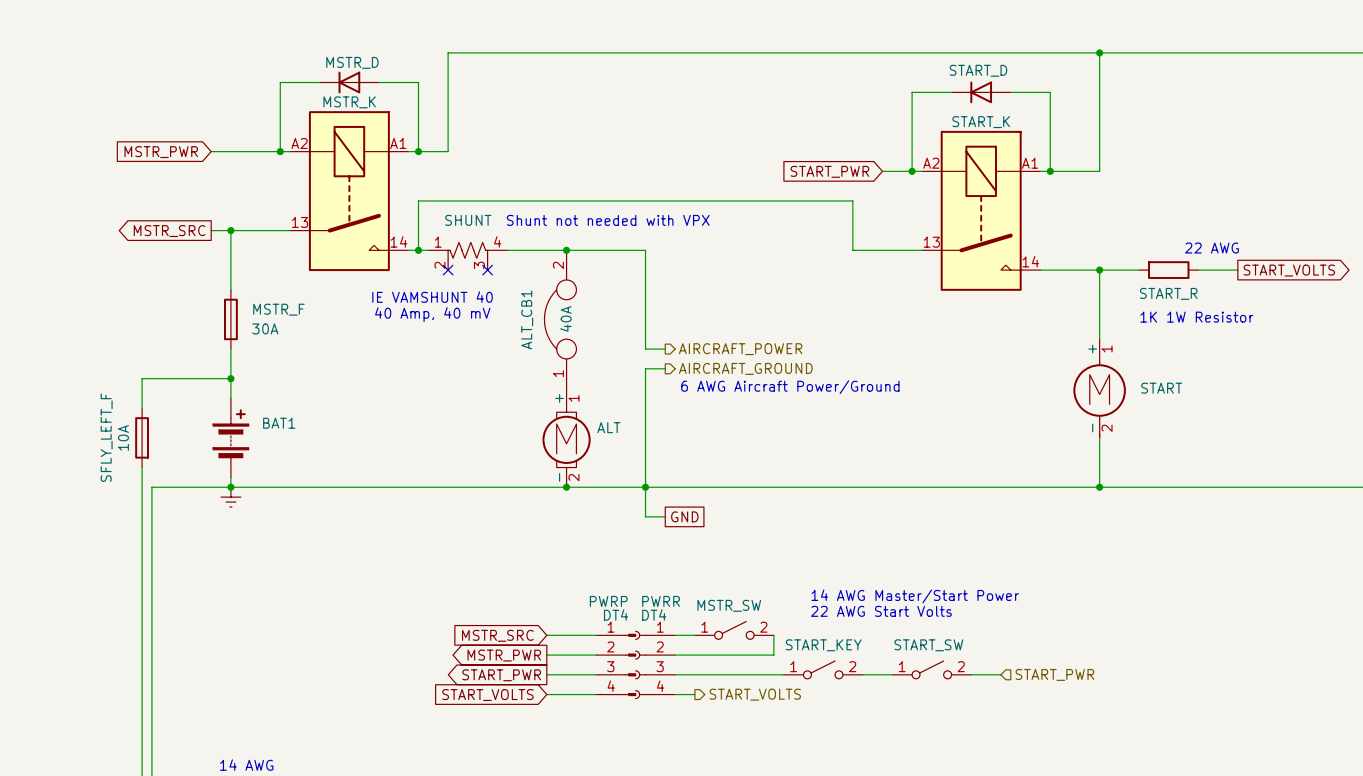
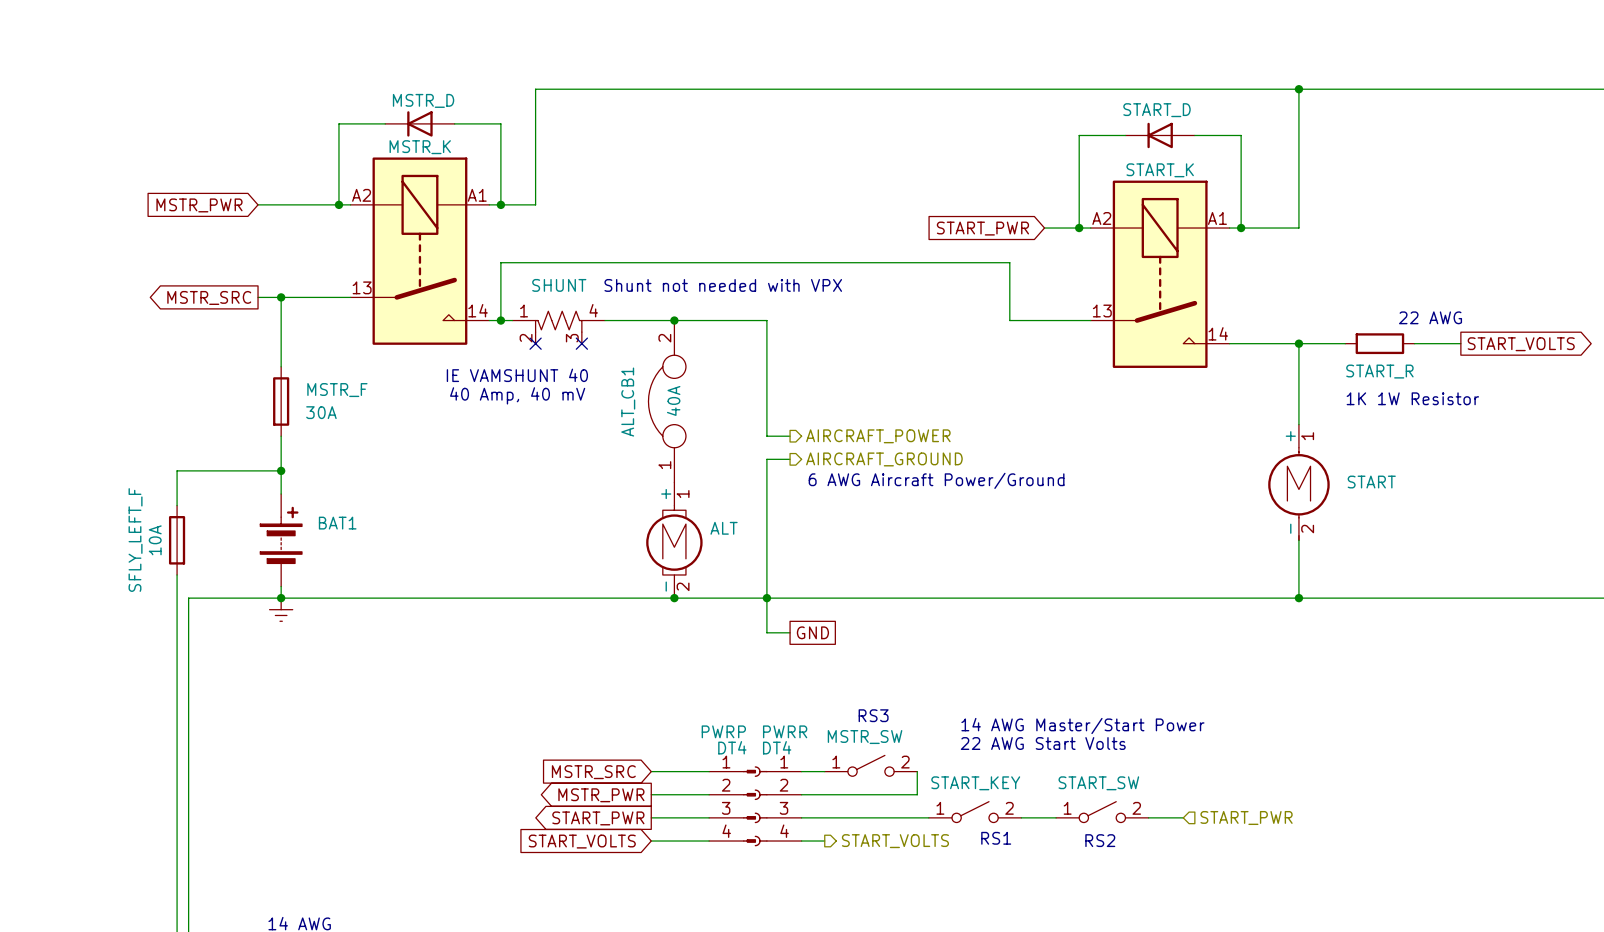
text: none -> RS3 (873, 715)
text: none -> RS1 (996, 838)
text: none -> RS2 (1100, 840)

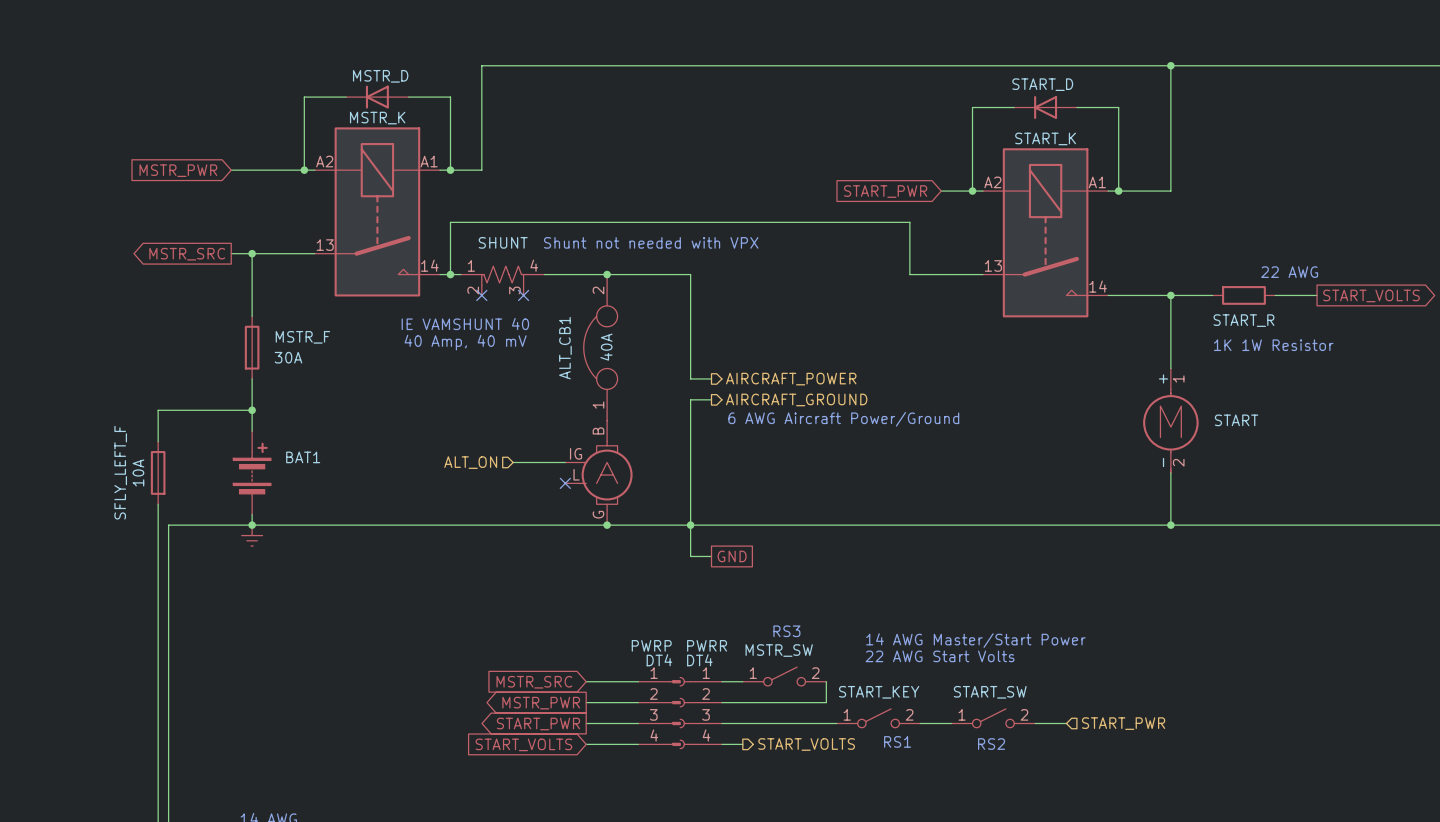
hierarchical label: none -> ALT_ON (470, 462)
wire: none -> (513, 462) (565, 462)
part: none -> (598, 472)
ALT: (674, 540) -> none
no-connect mark: none -> (565, 483)

